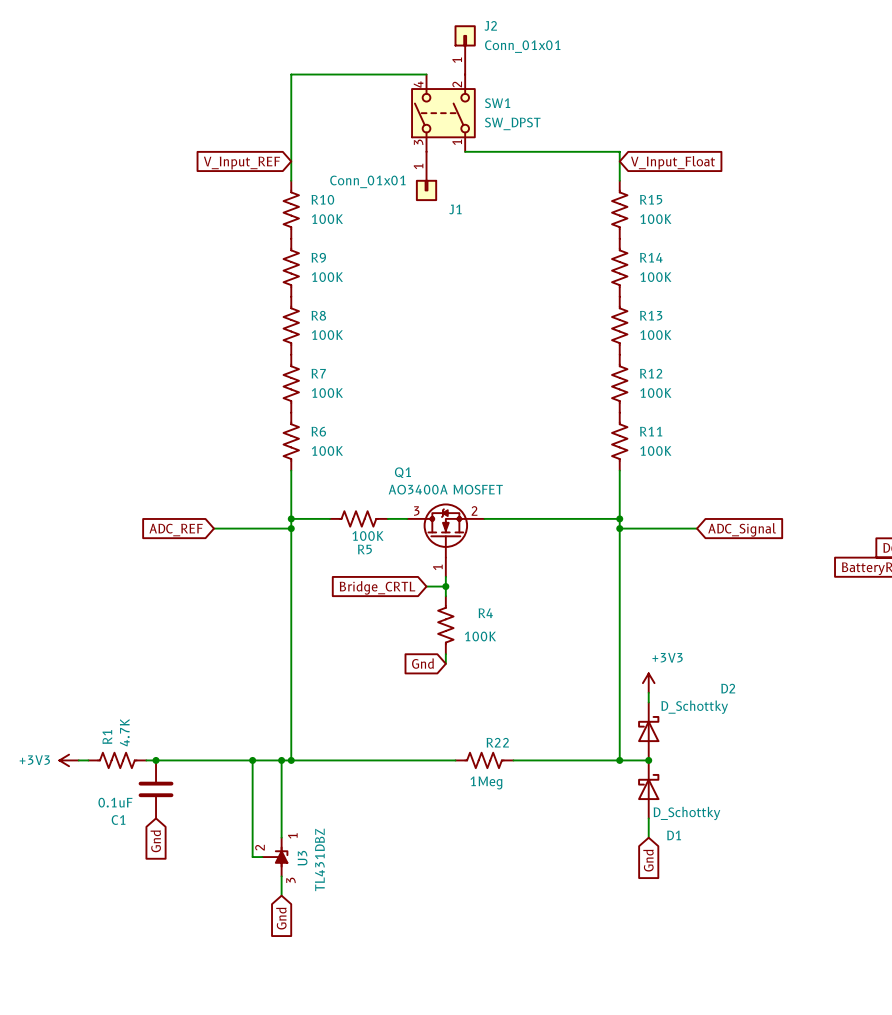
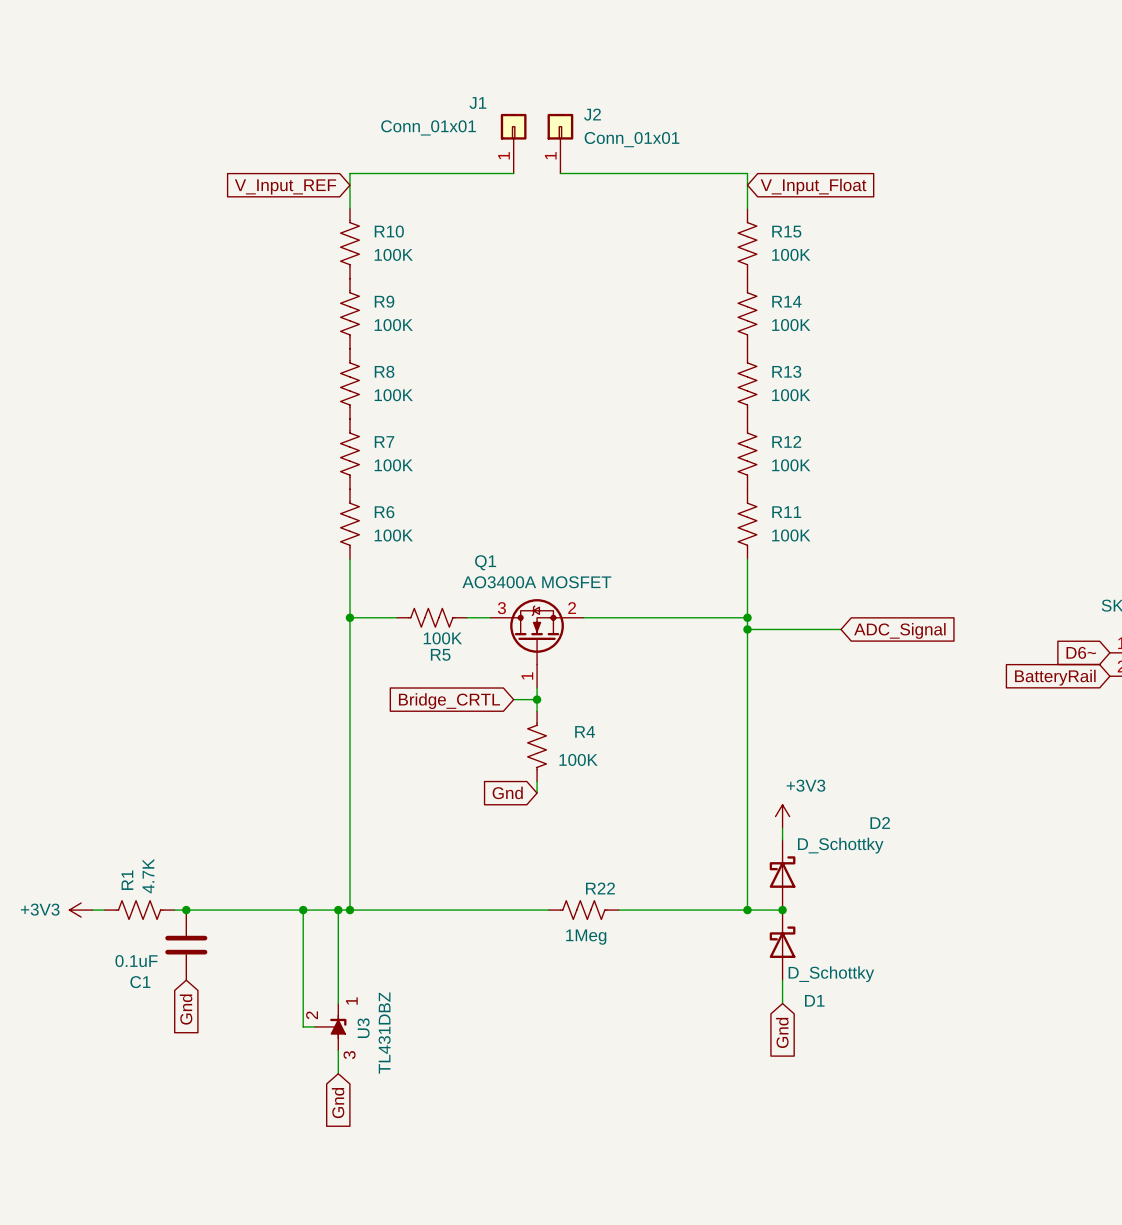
J2 position: (465, 49) -> (560, 143)
wire: (426, 74) (291, 74) (291, 151) -> (513, 173) (349, 173)
SW1: SW_DPST (443, 113) -> none
J1 position: (426, 176) -> (513, 143)
J1 value position: Conn_01x01 (367, 181) -> Conn_01x01 (428, 127)
J1 rotation: 0° (426, 190) -> 180° (513, 126)
wire: (213, 528) (291, 528) -> none
junction: (291, 528) -> none
global label: ADC_REF (176, 530) -> none

